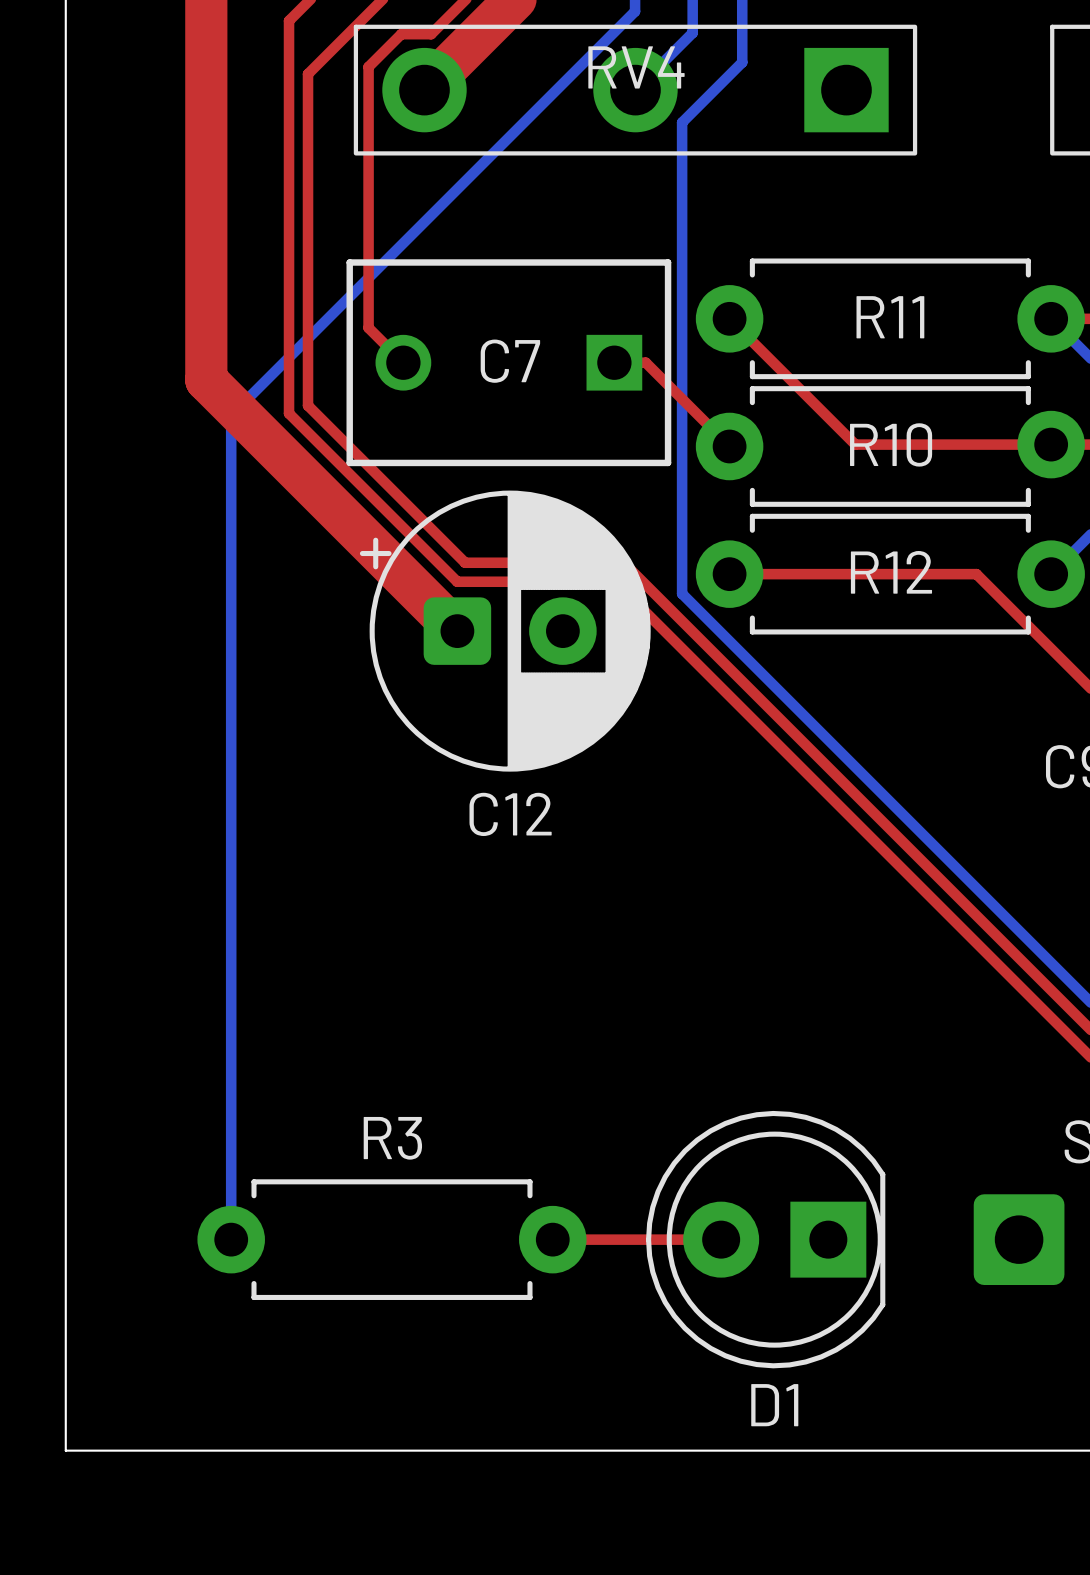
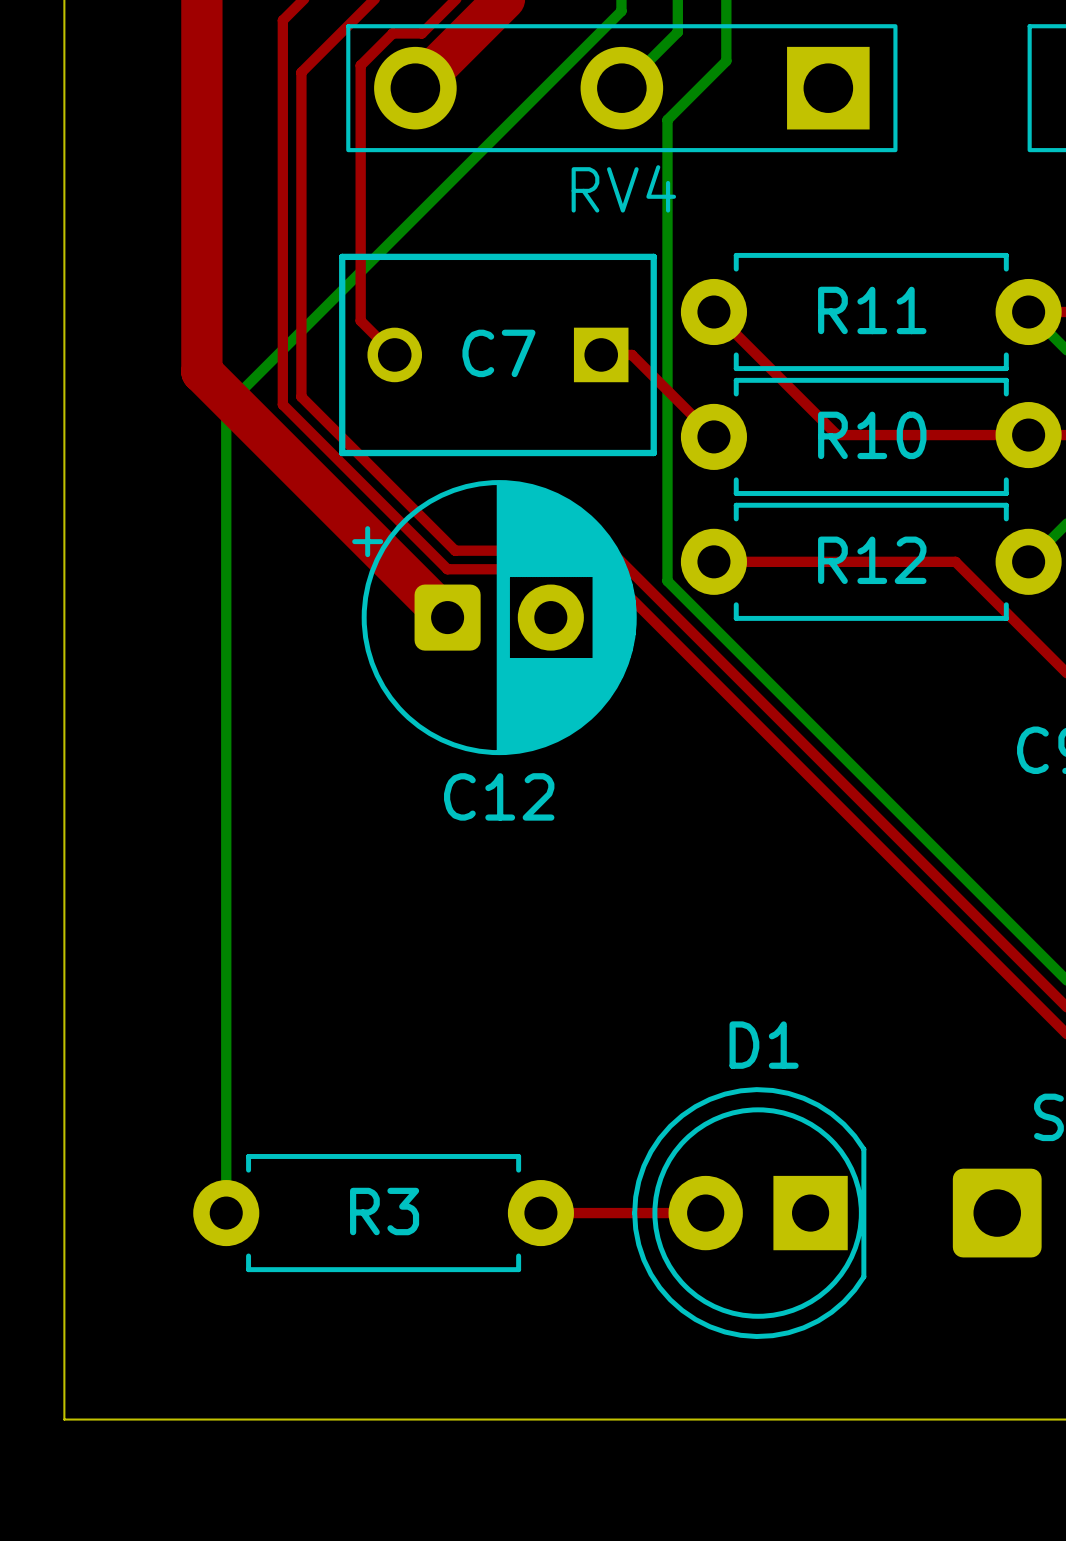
RV4 name position: RV4 (636, 67) -> RV4 (623, 188)
R3 name position: R3 (392, 1138) -> R3 (384, 1211)
D1 name position: D1 (774, 1405) -> D1 (764, 1045)

